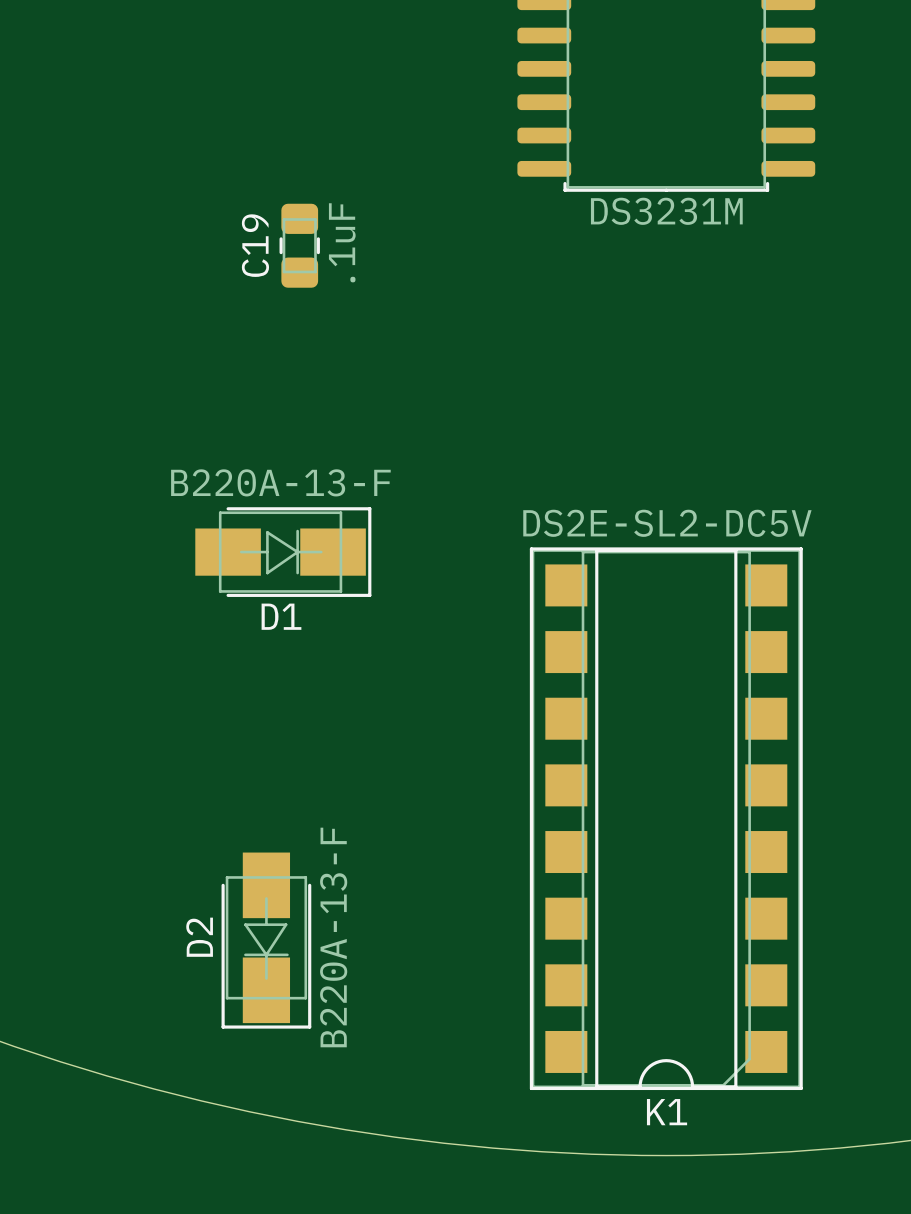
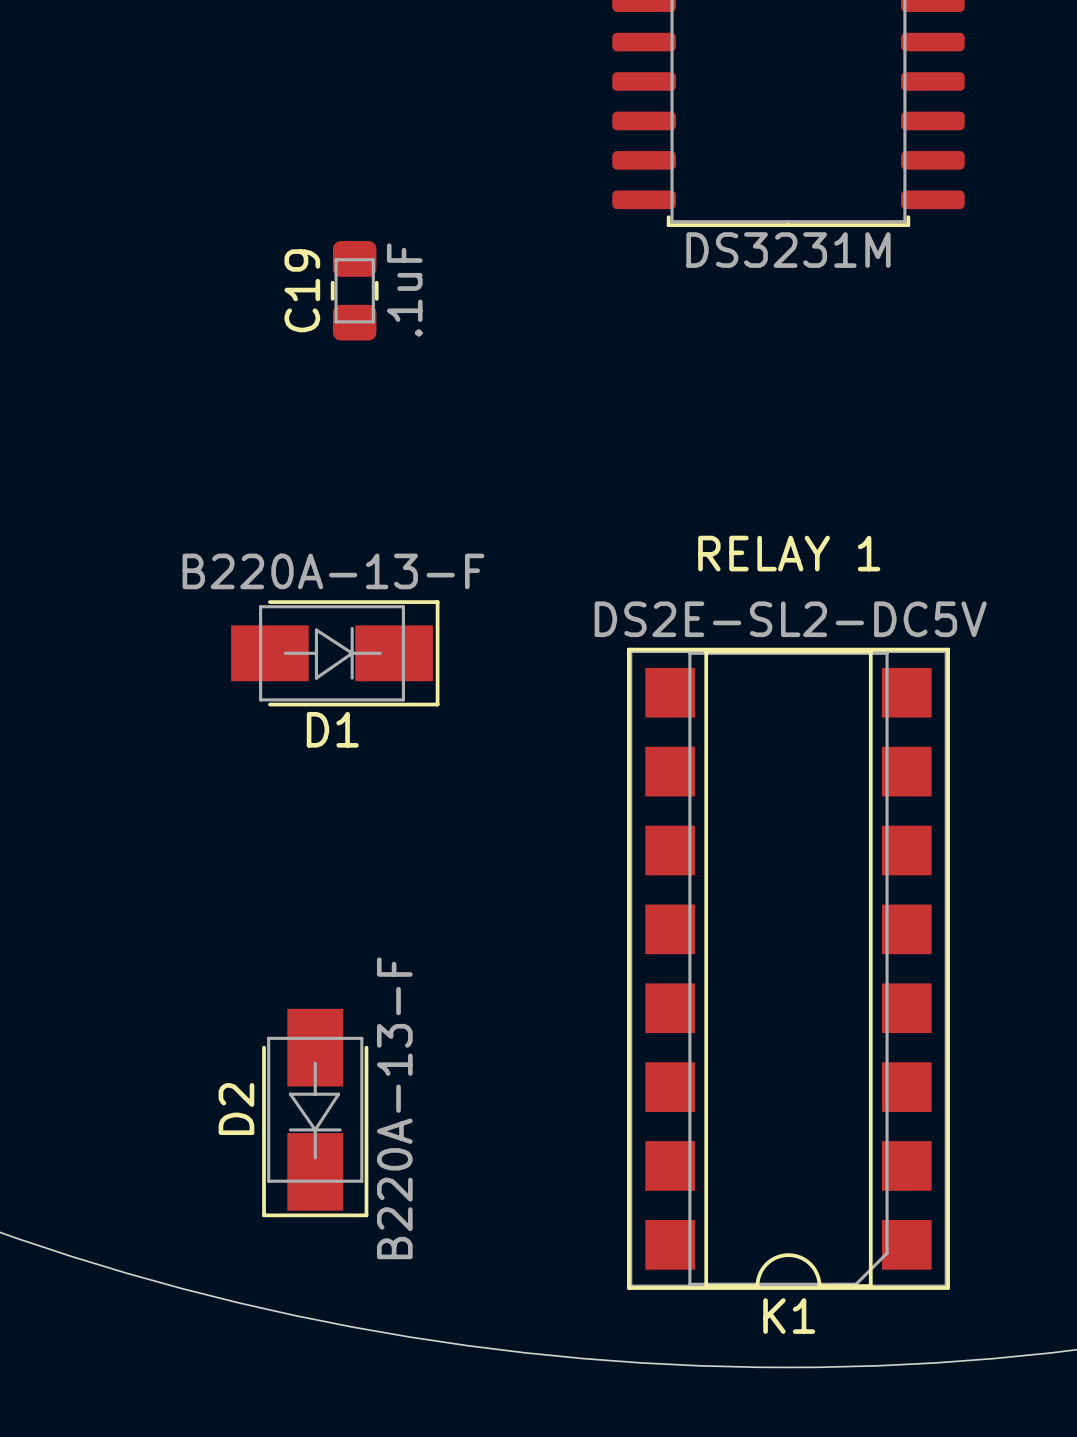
text: none -> RELAY 1 (789, 553)

